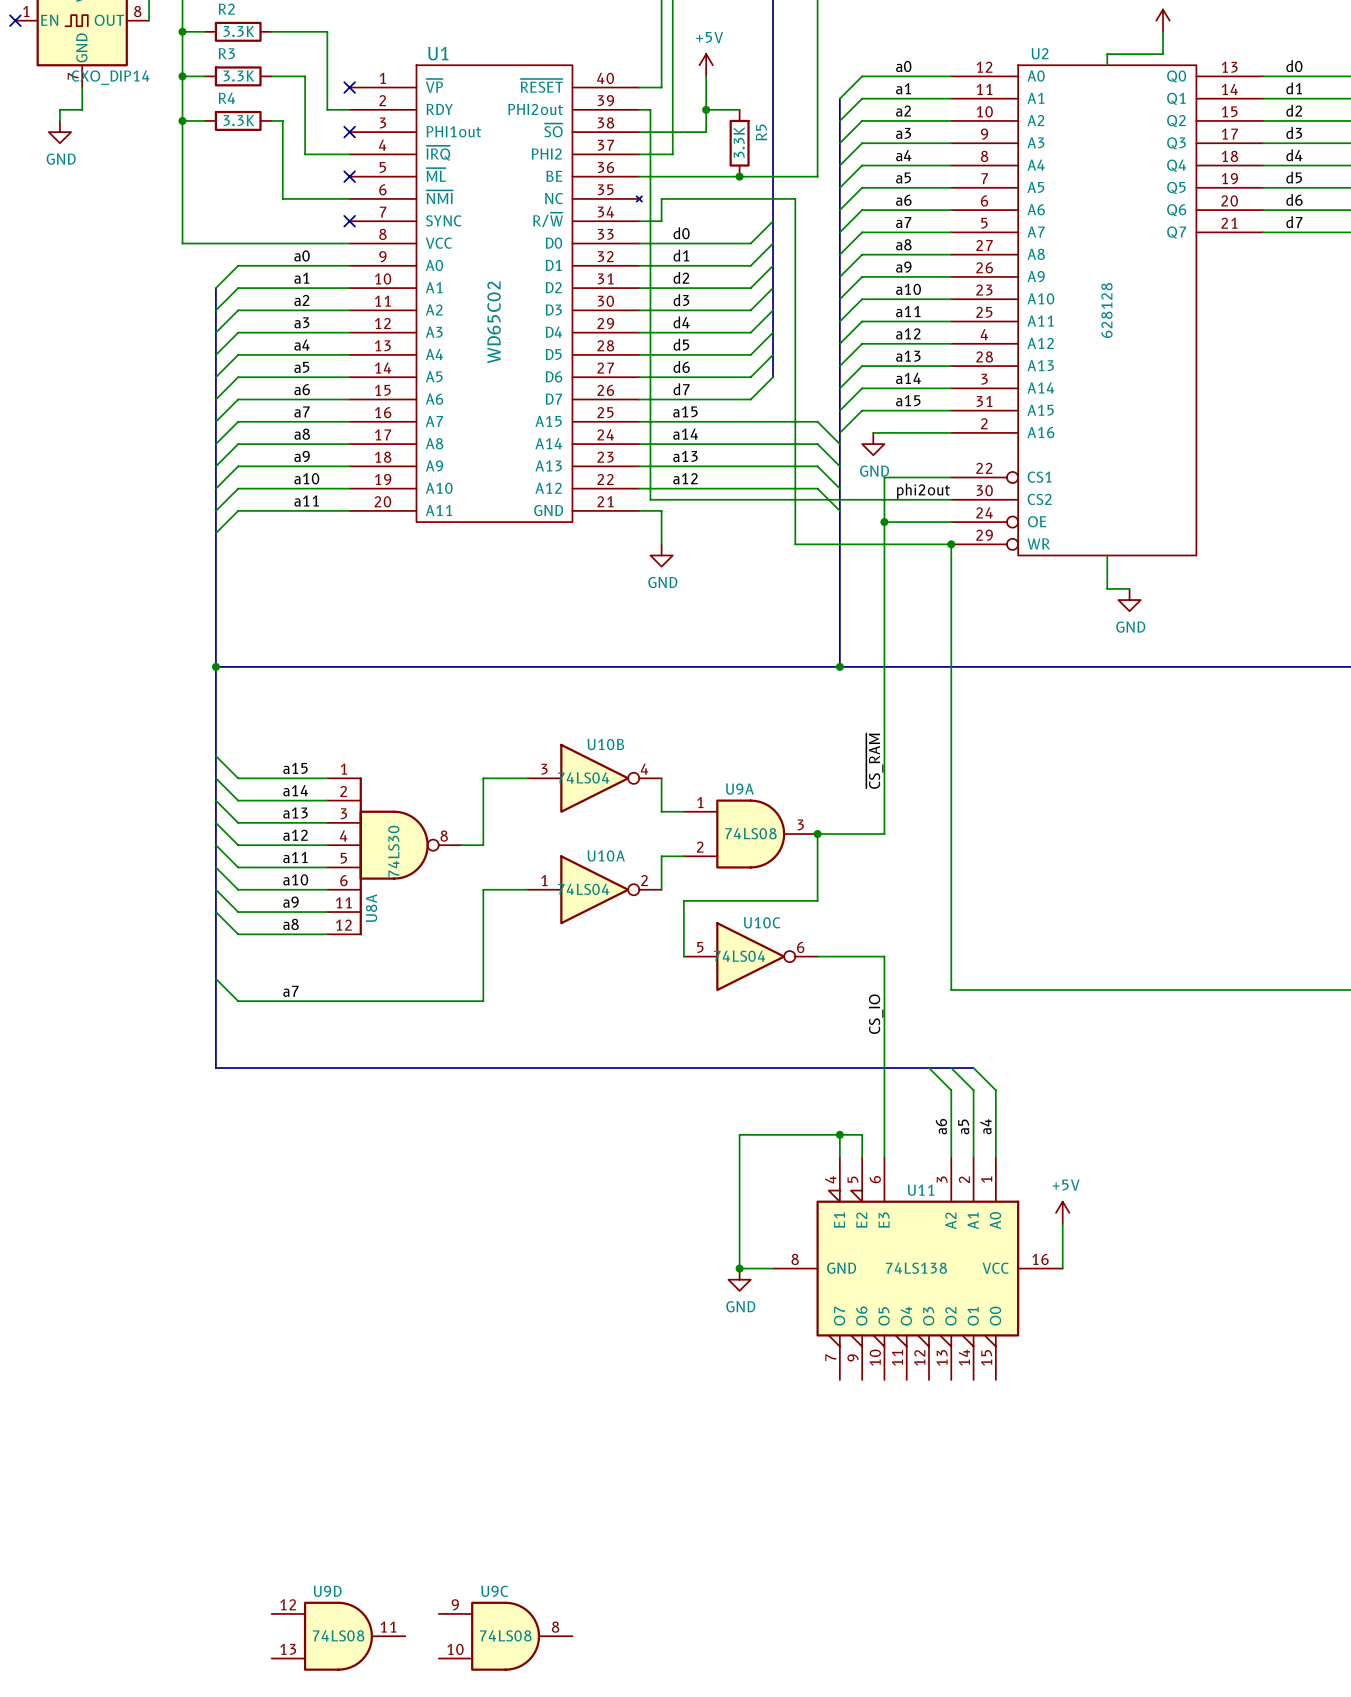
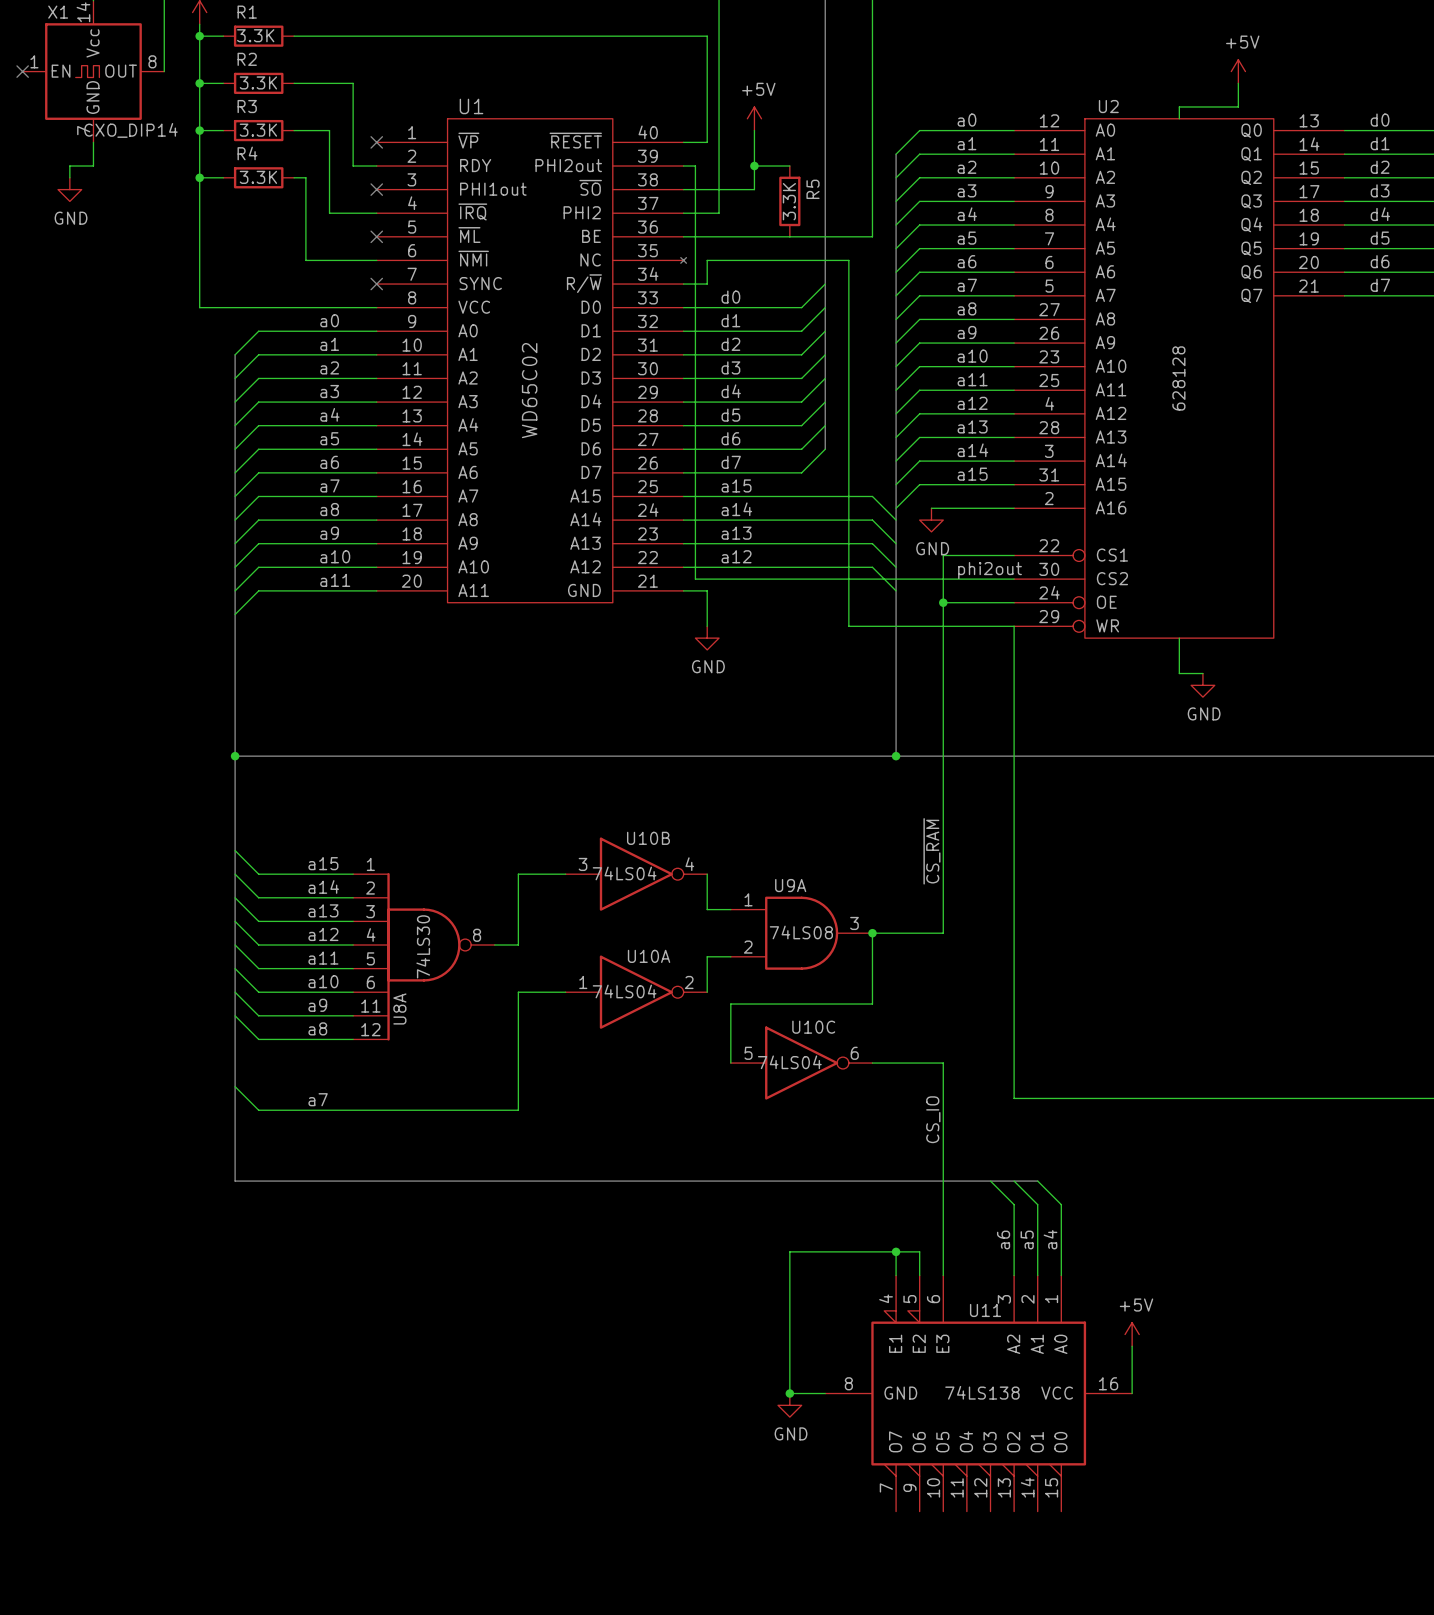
junction: (739, 176) -> none
junction: (951, 544) -> none

